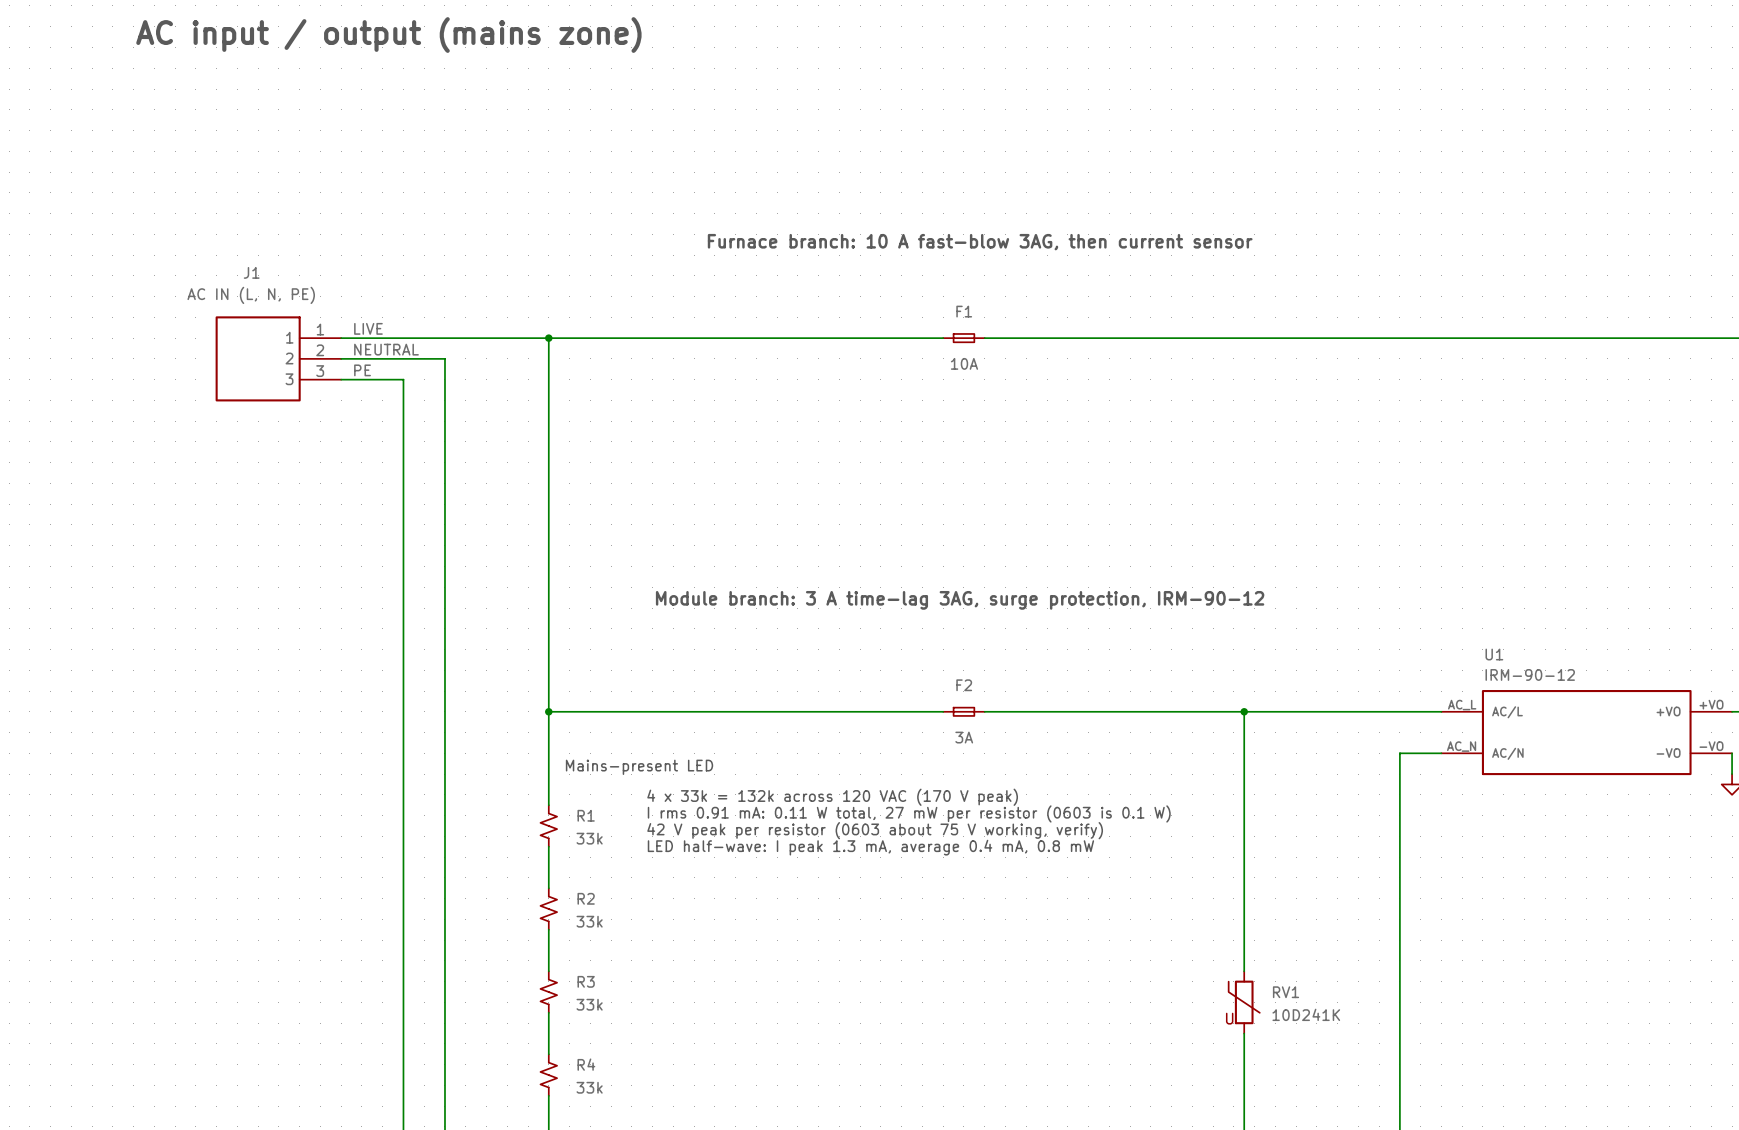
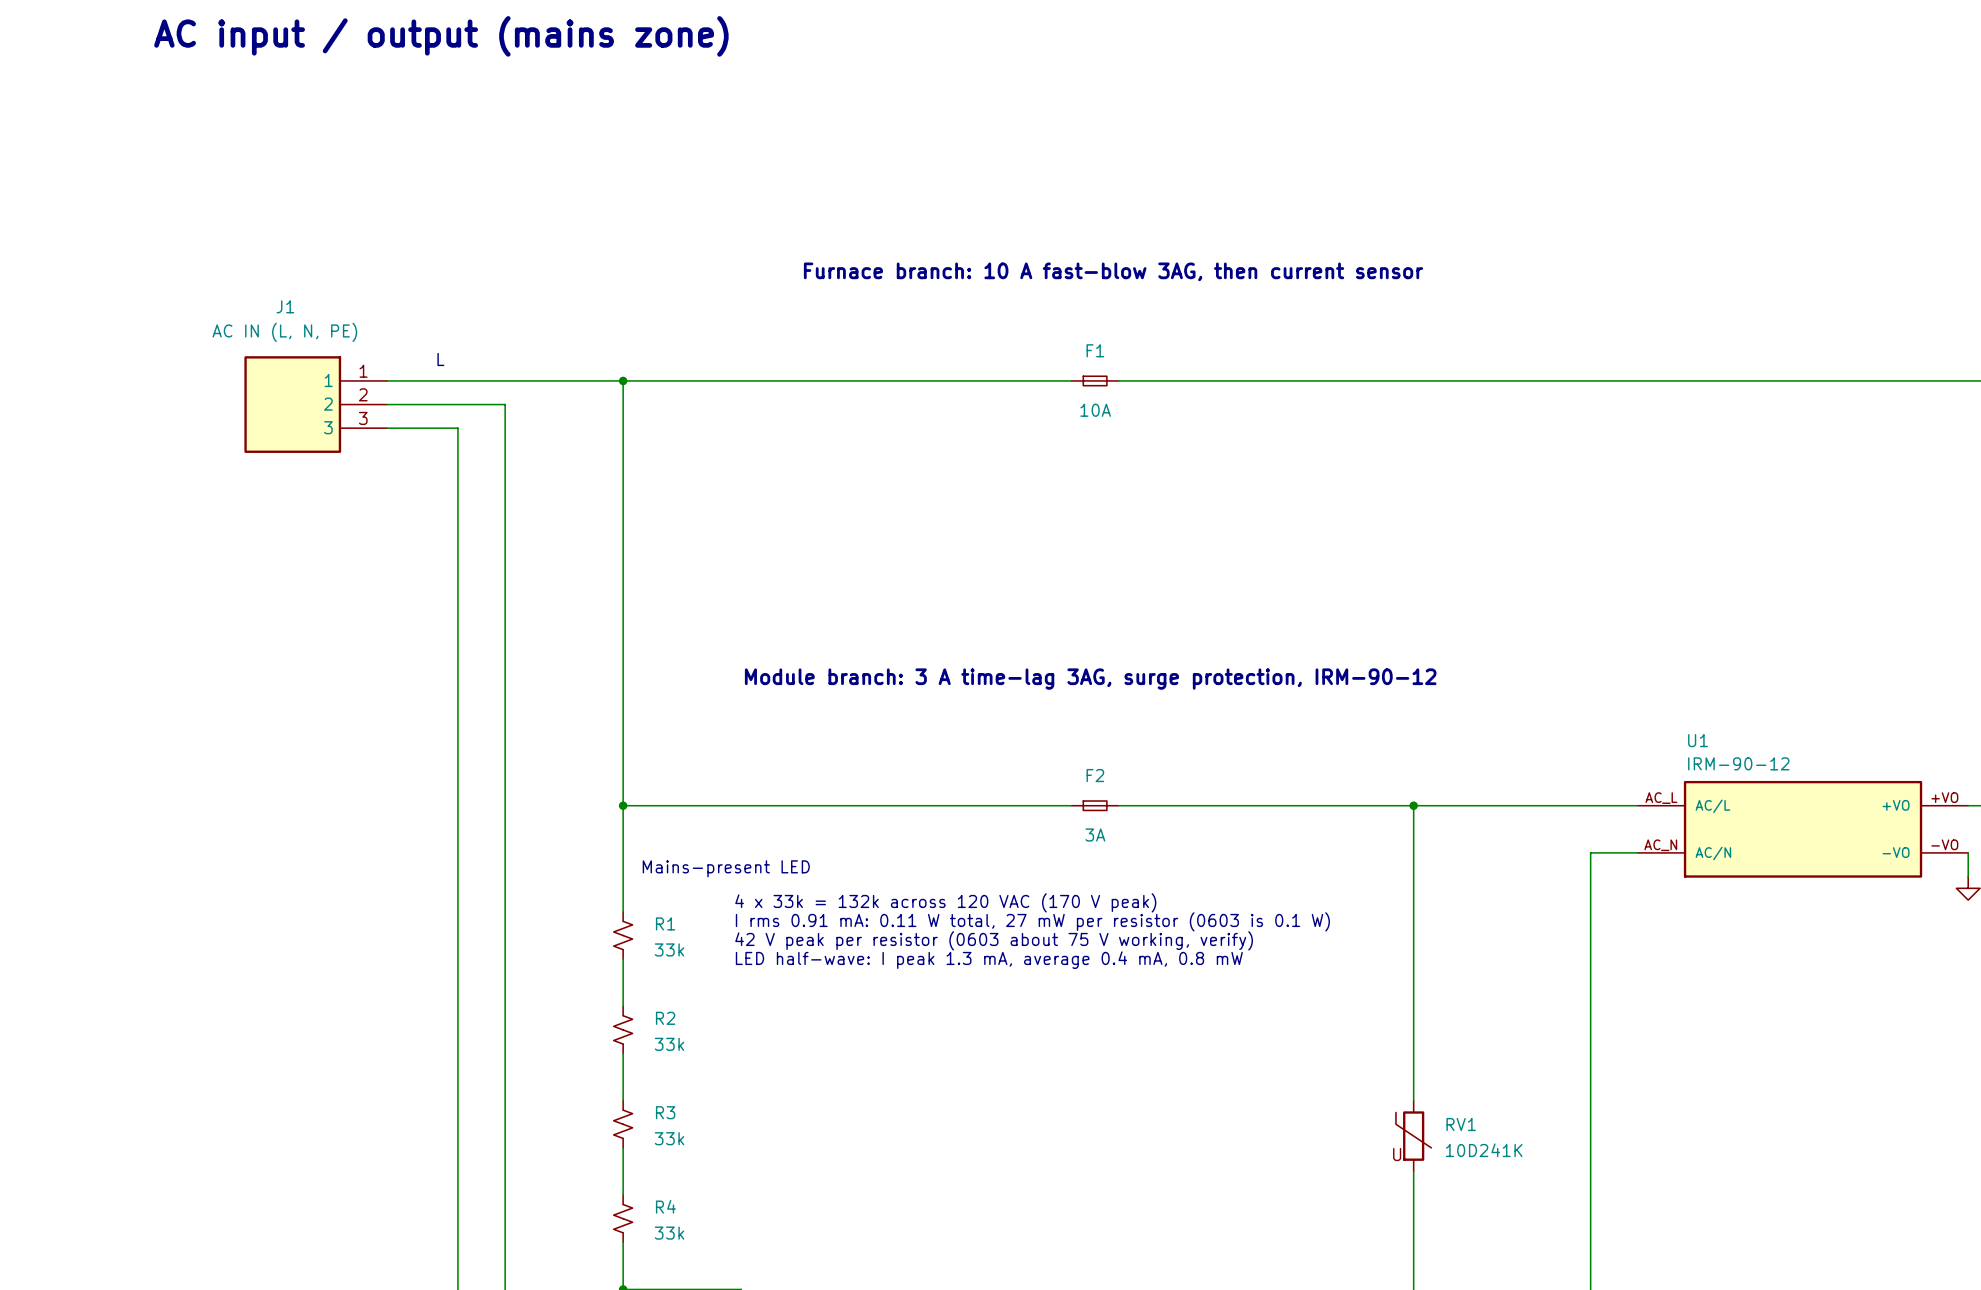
text: none -> L (440, 359)
label: LIVE (368, 328) -> none
label: NEUTRAL (386, 349) -> none
label: PE (362, 370) -> none

